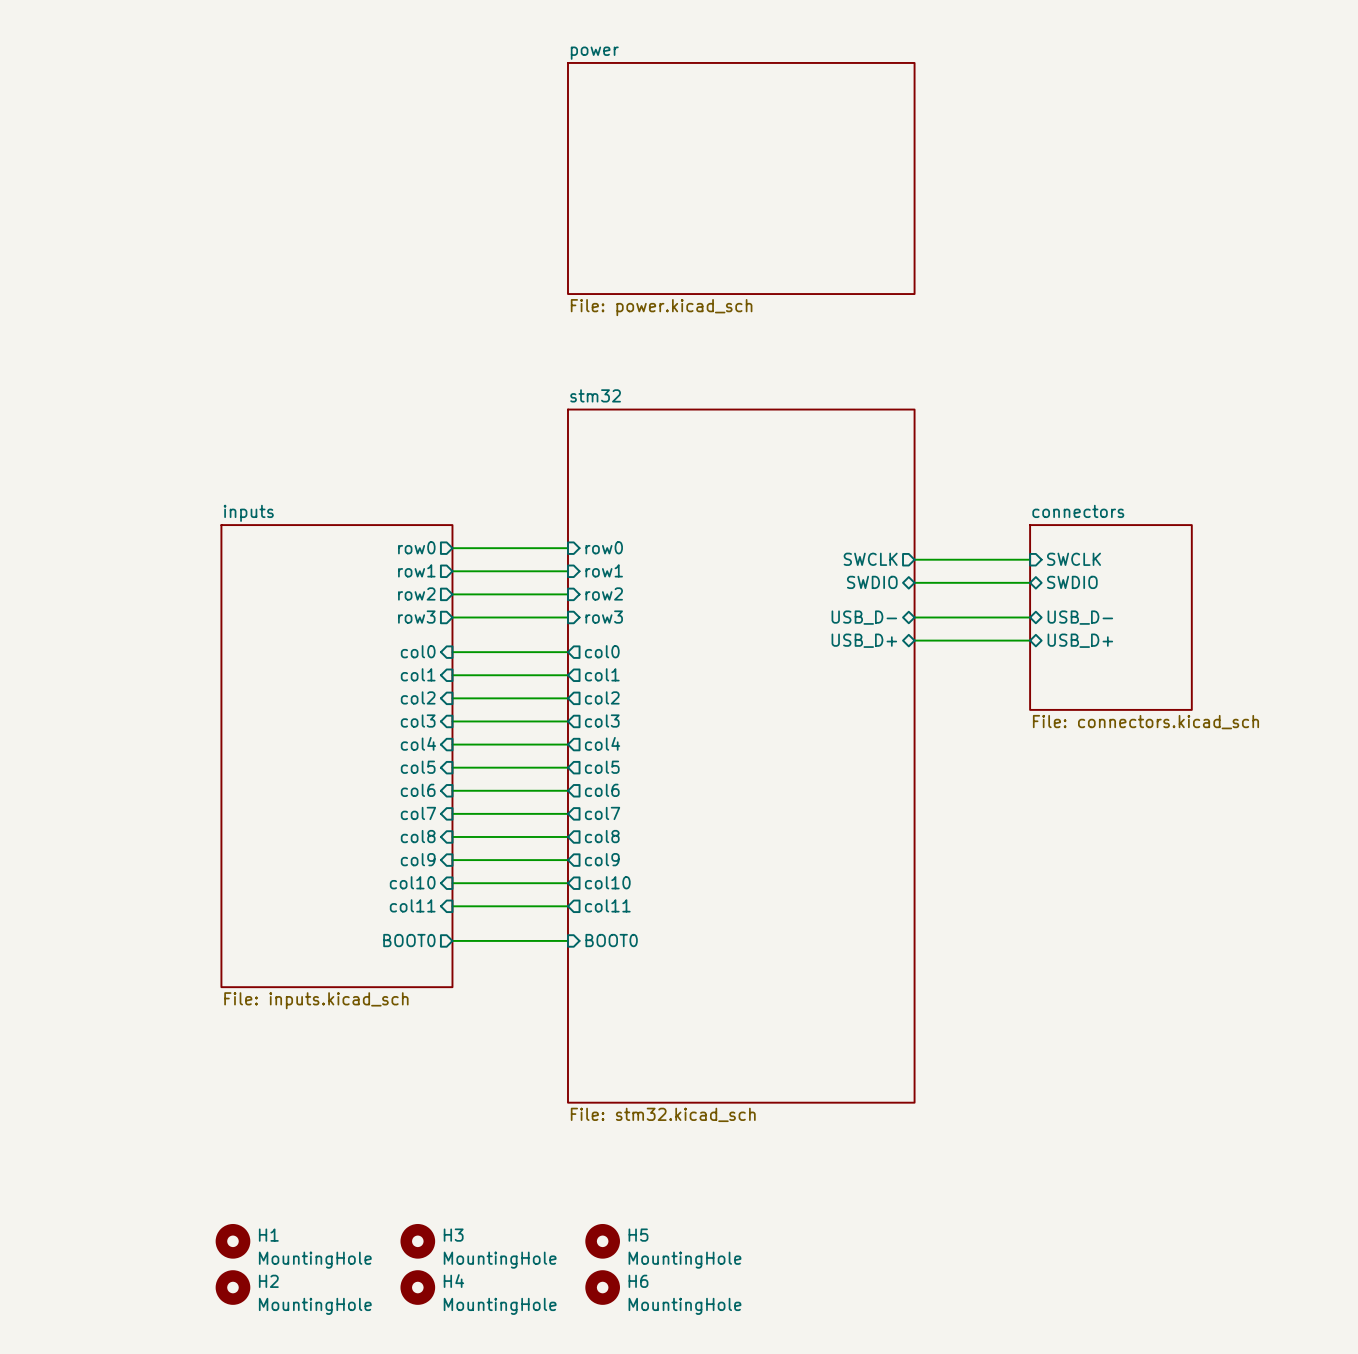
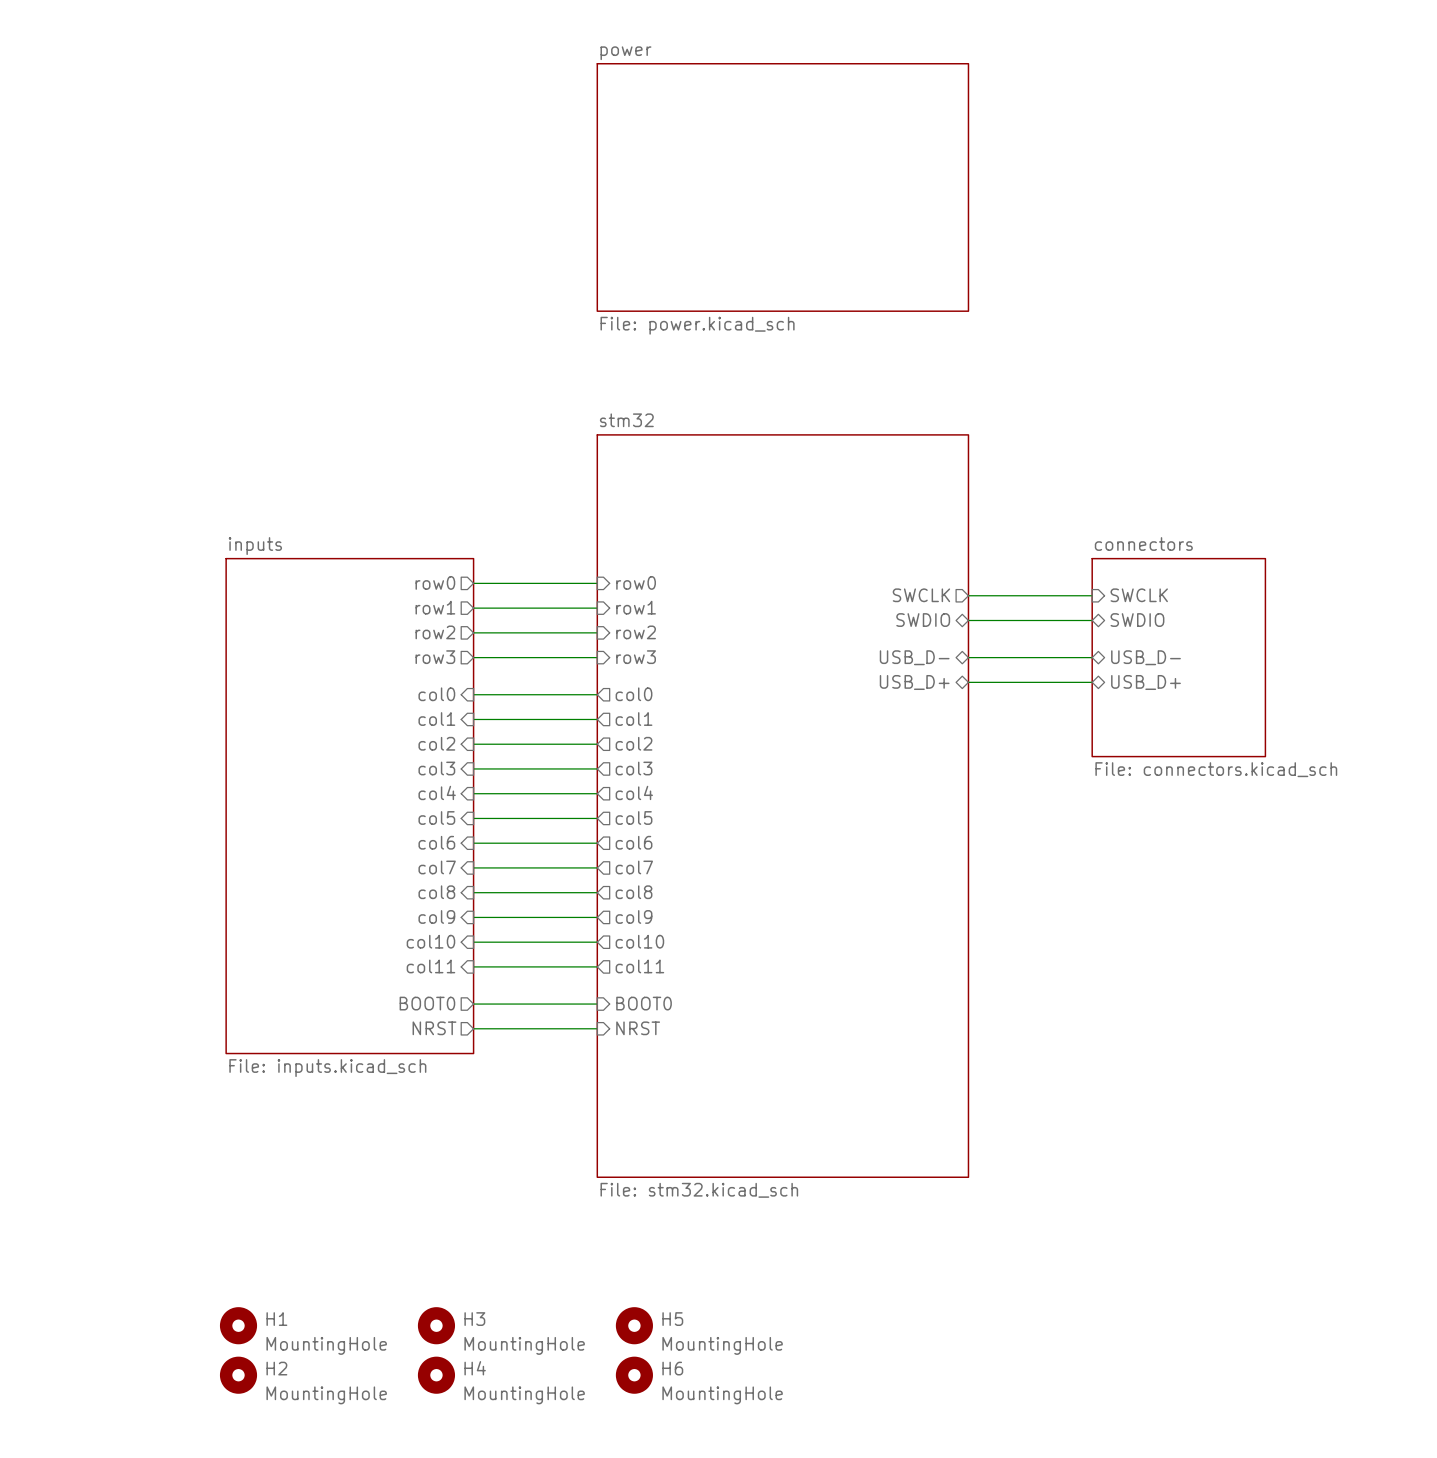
sheet pin: none -> NRST (434, 1028)
sheet pin: none -> NRST (638, 1028)
wire: none -> (473, 1028) (597, 1028)

